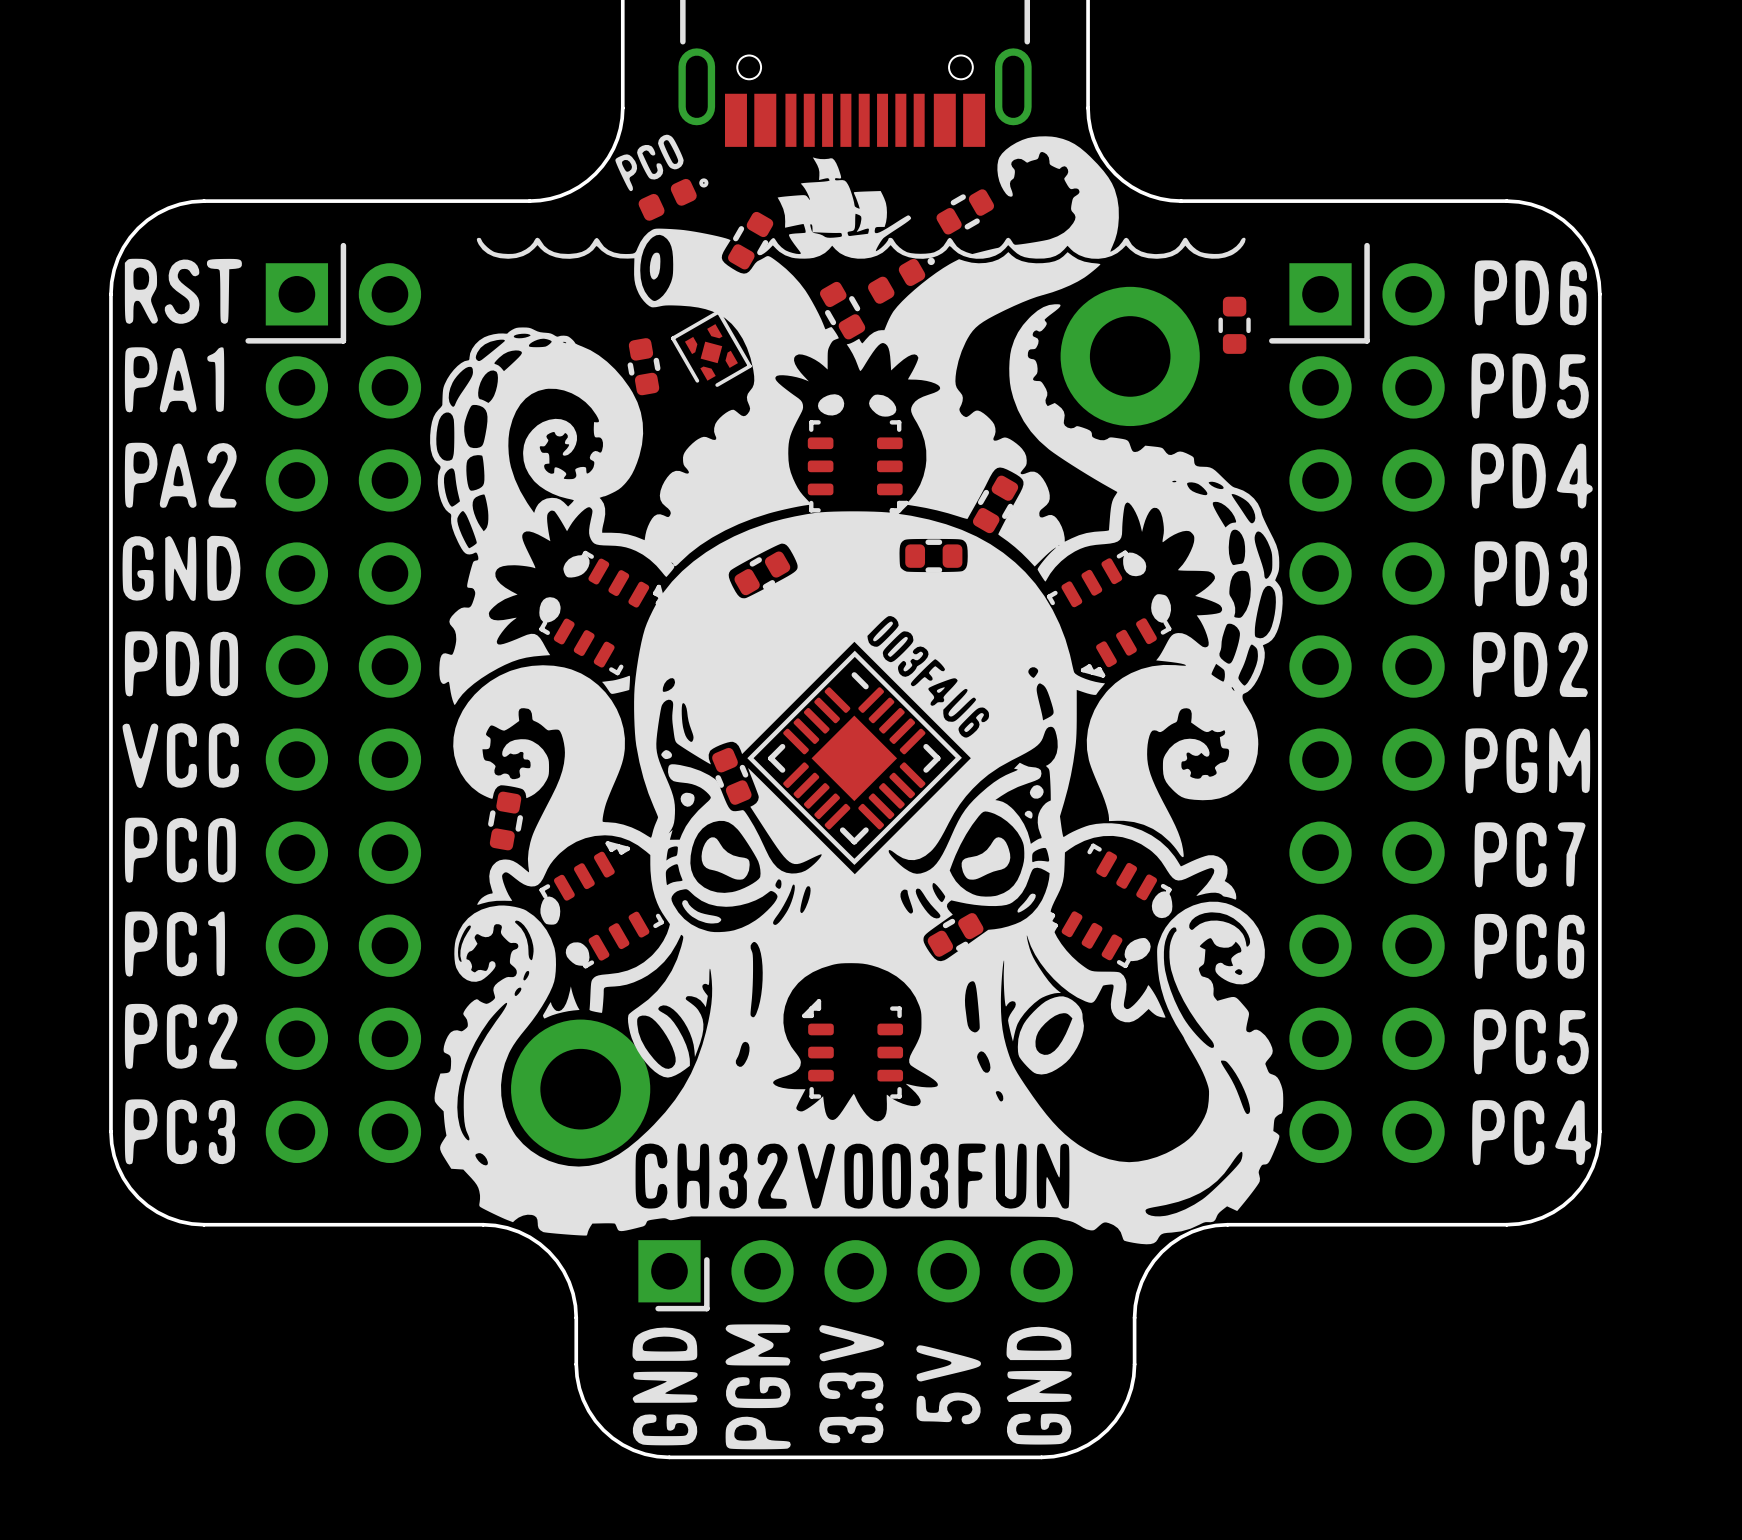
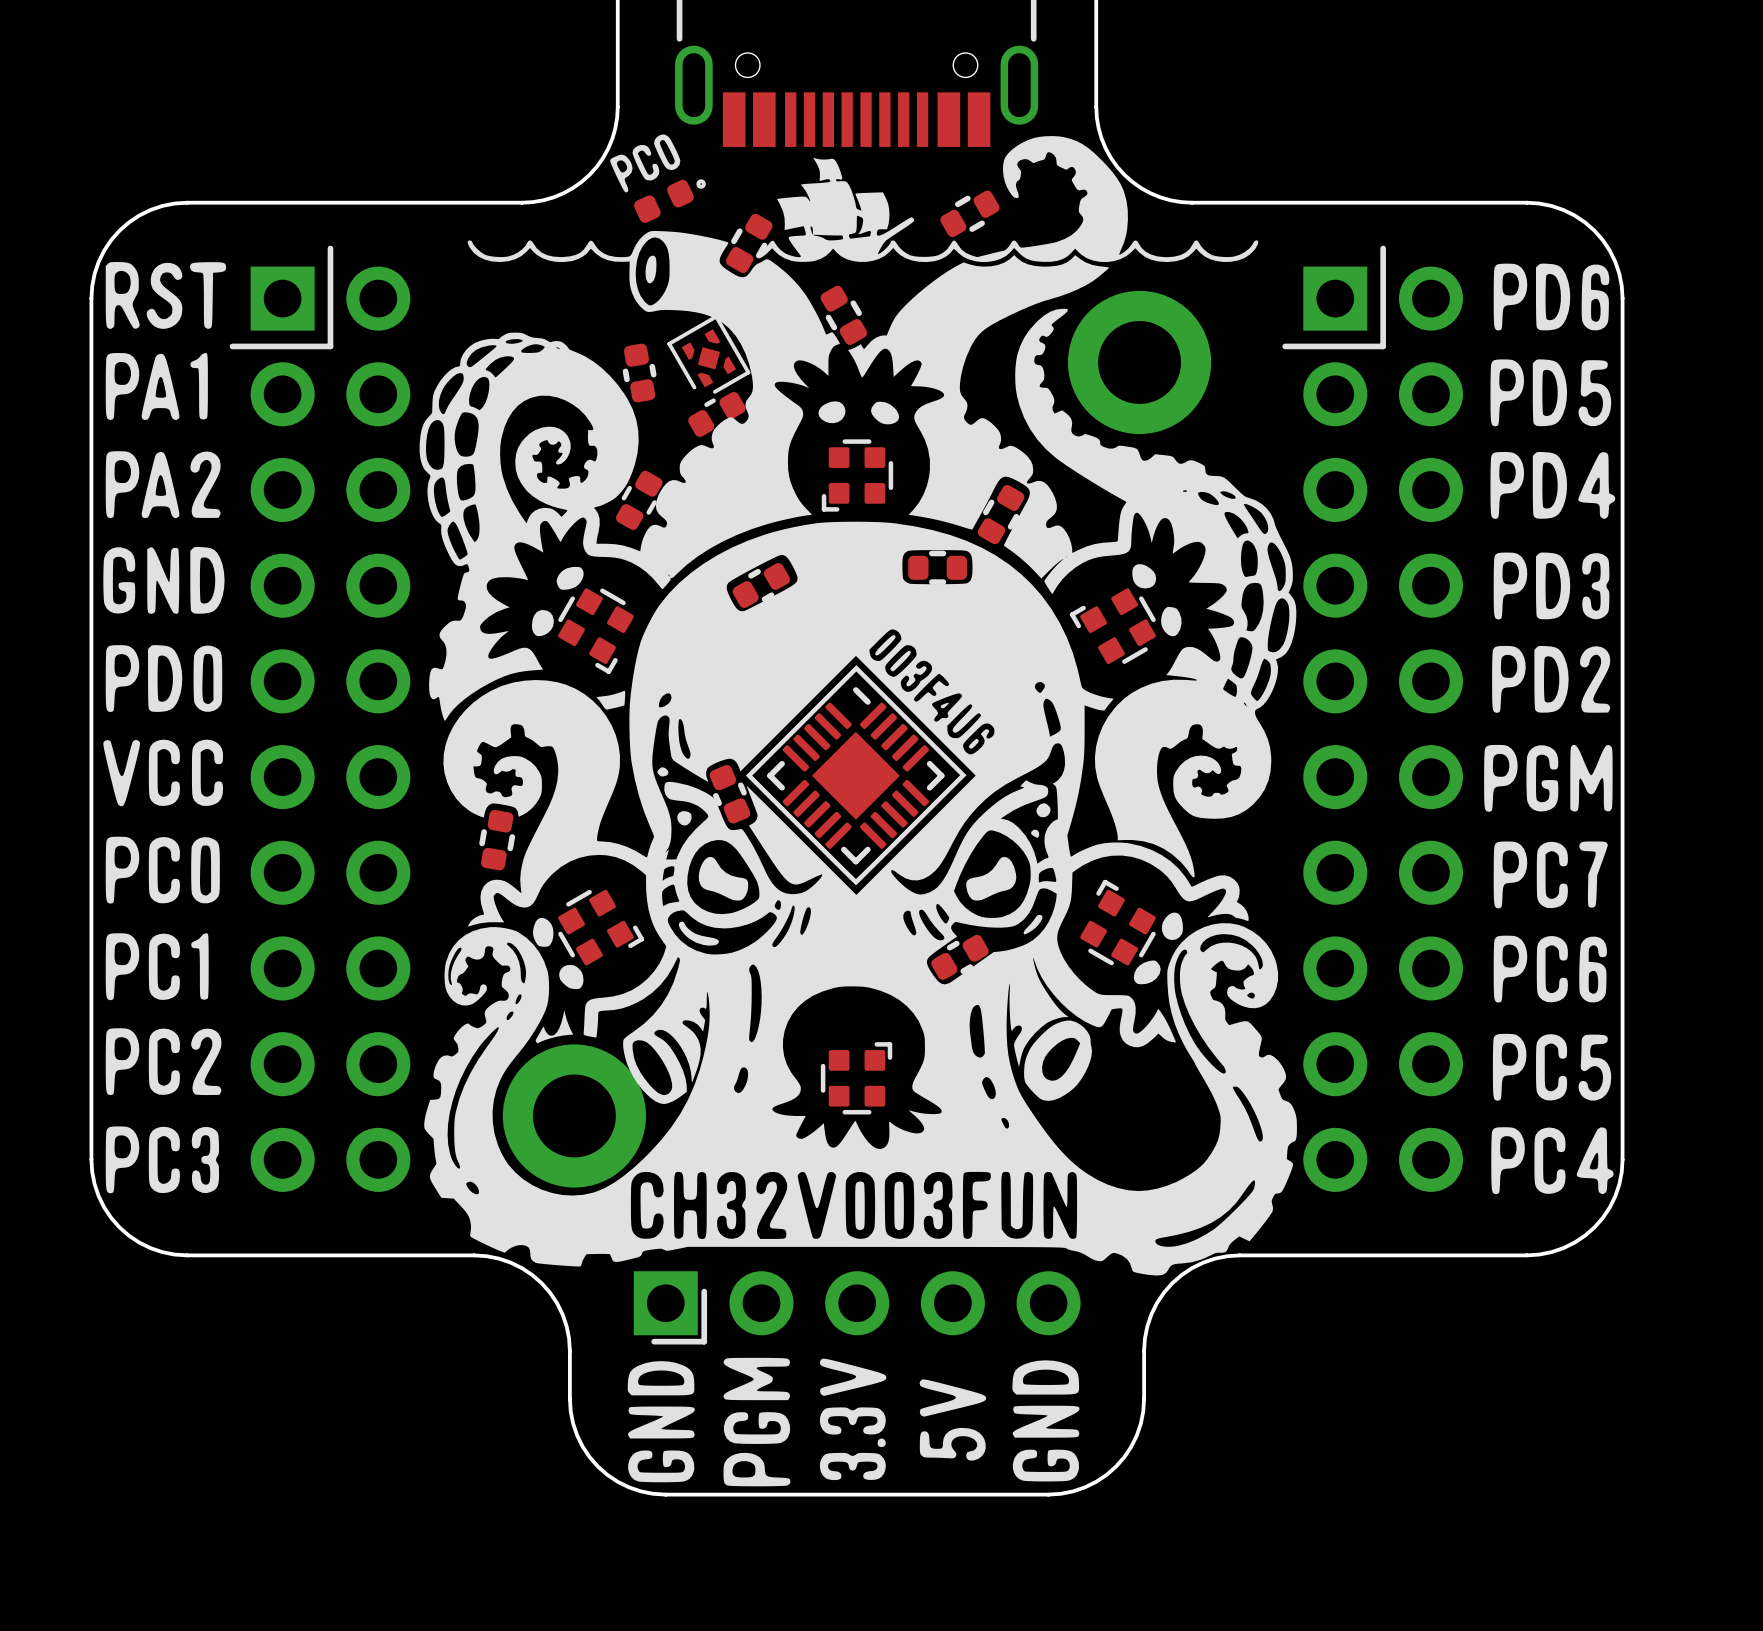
part: (901, 280) -> none
part: (1234, 325) -> none
part: none -> (716, 414)
part footprint: [801, 412, 909, 520] -> [821, 439, 894, 512]
part: none -> (639, 500)
part footprint: [1046, 540, 1172, 678] -> [1069, 588, 1156, 665]
part footprint: [529, 550, 667, 676] -> [558, 588, 634, 674]
part footprint: [539, 841, 664, 979] -> [558, 889, 645, 966]
part footprint: [1044, 843, 1182, 969] -> [1080, 879, 1156, 966]
part footprint: [802, 999, 910, 1107] -> [820, 1042, 893, 1115]

